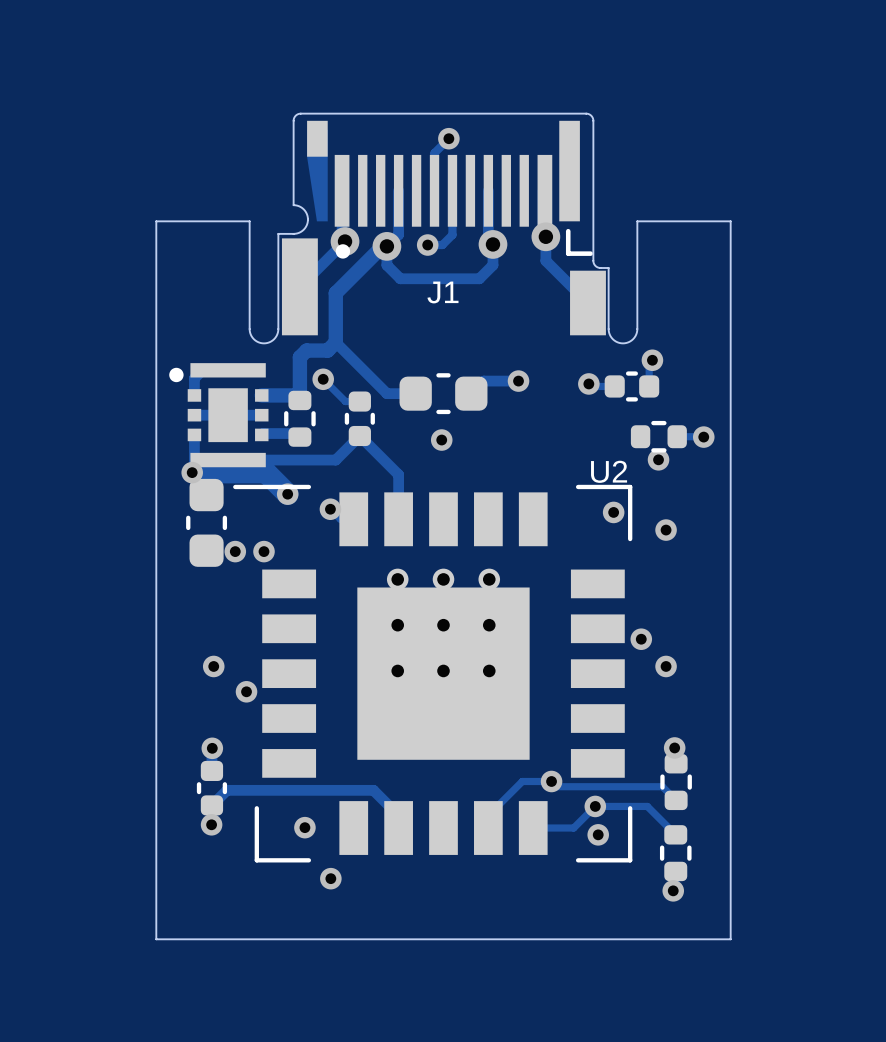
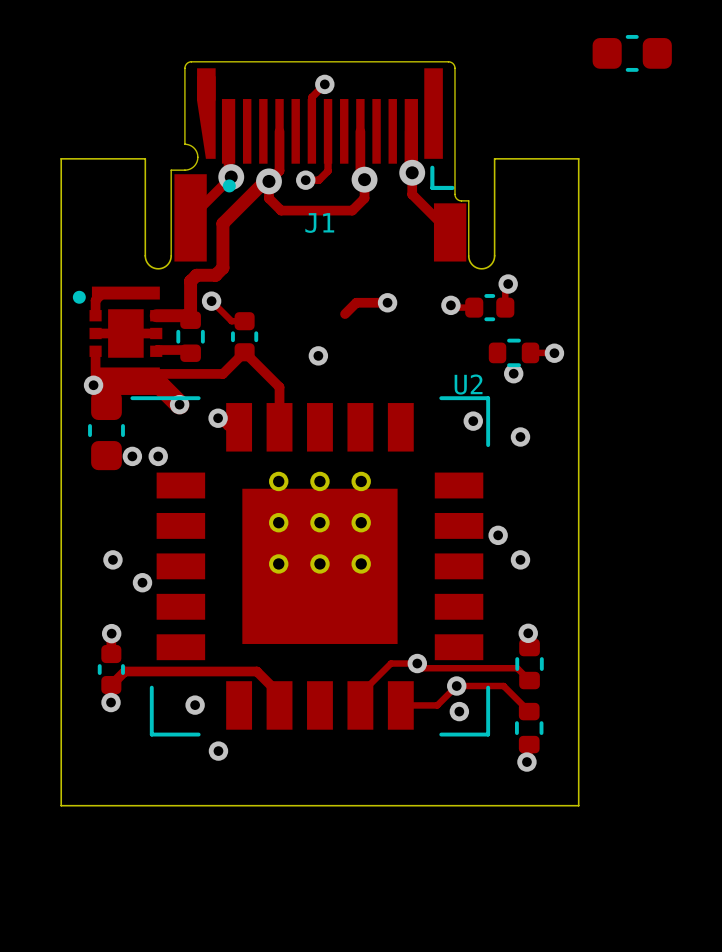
track: (335, 342) (386, 393) (415, 393) -> none
part position: (443, 393) -> (632, 53)

